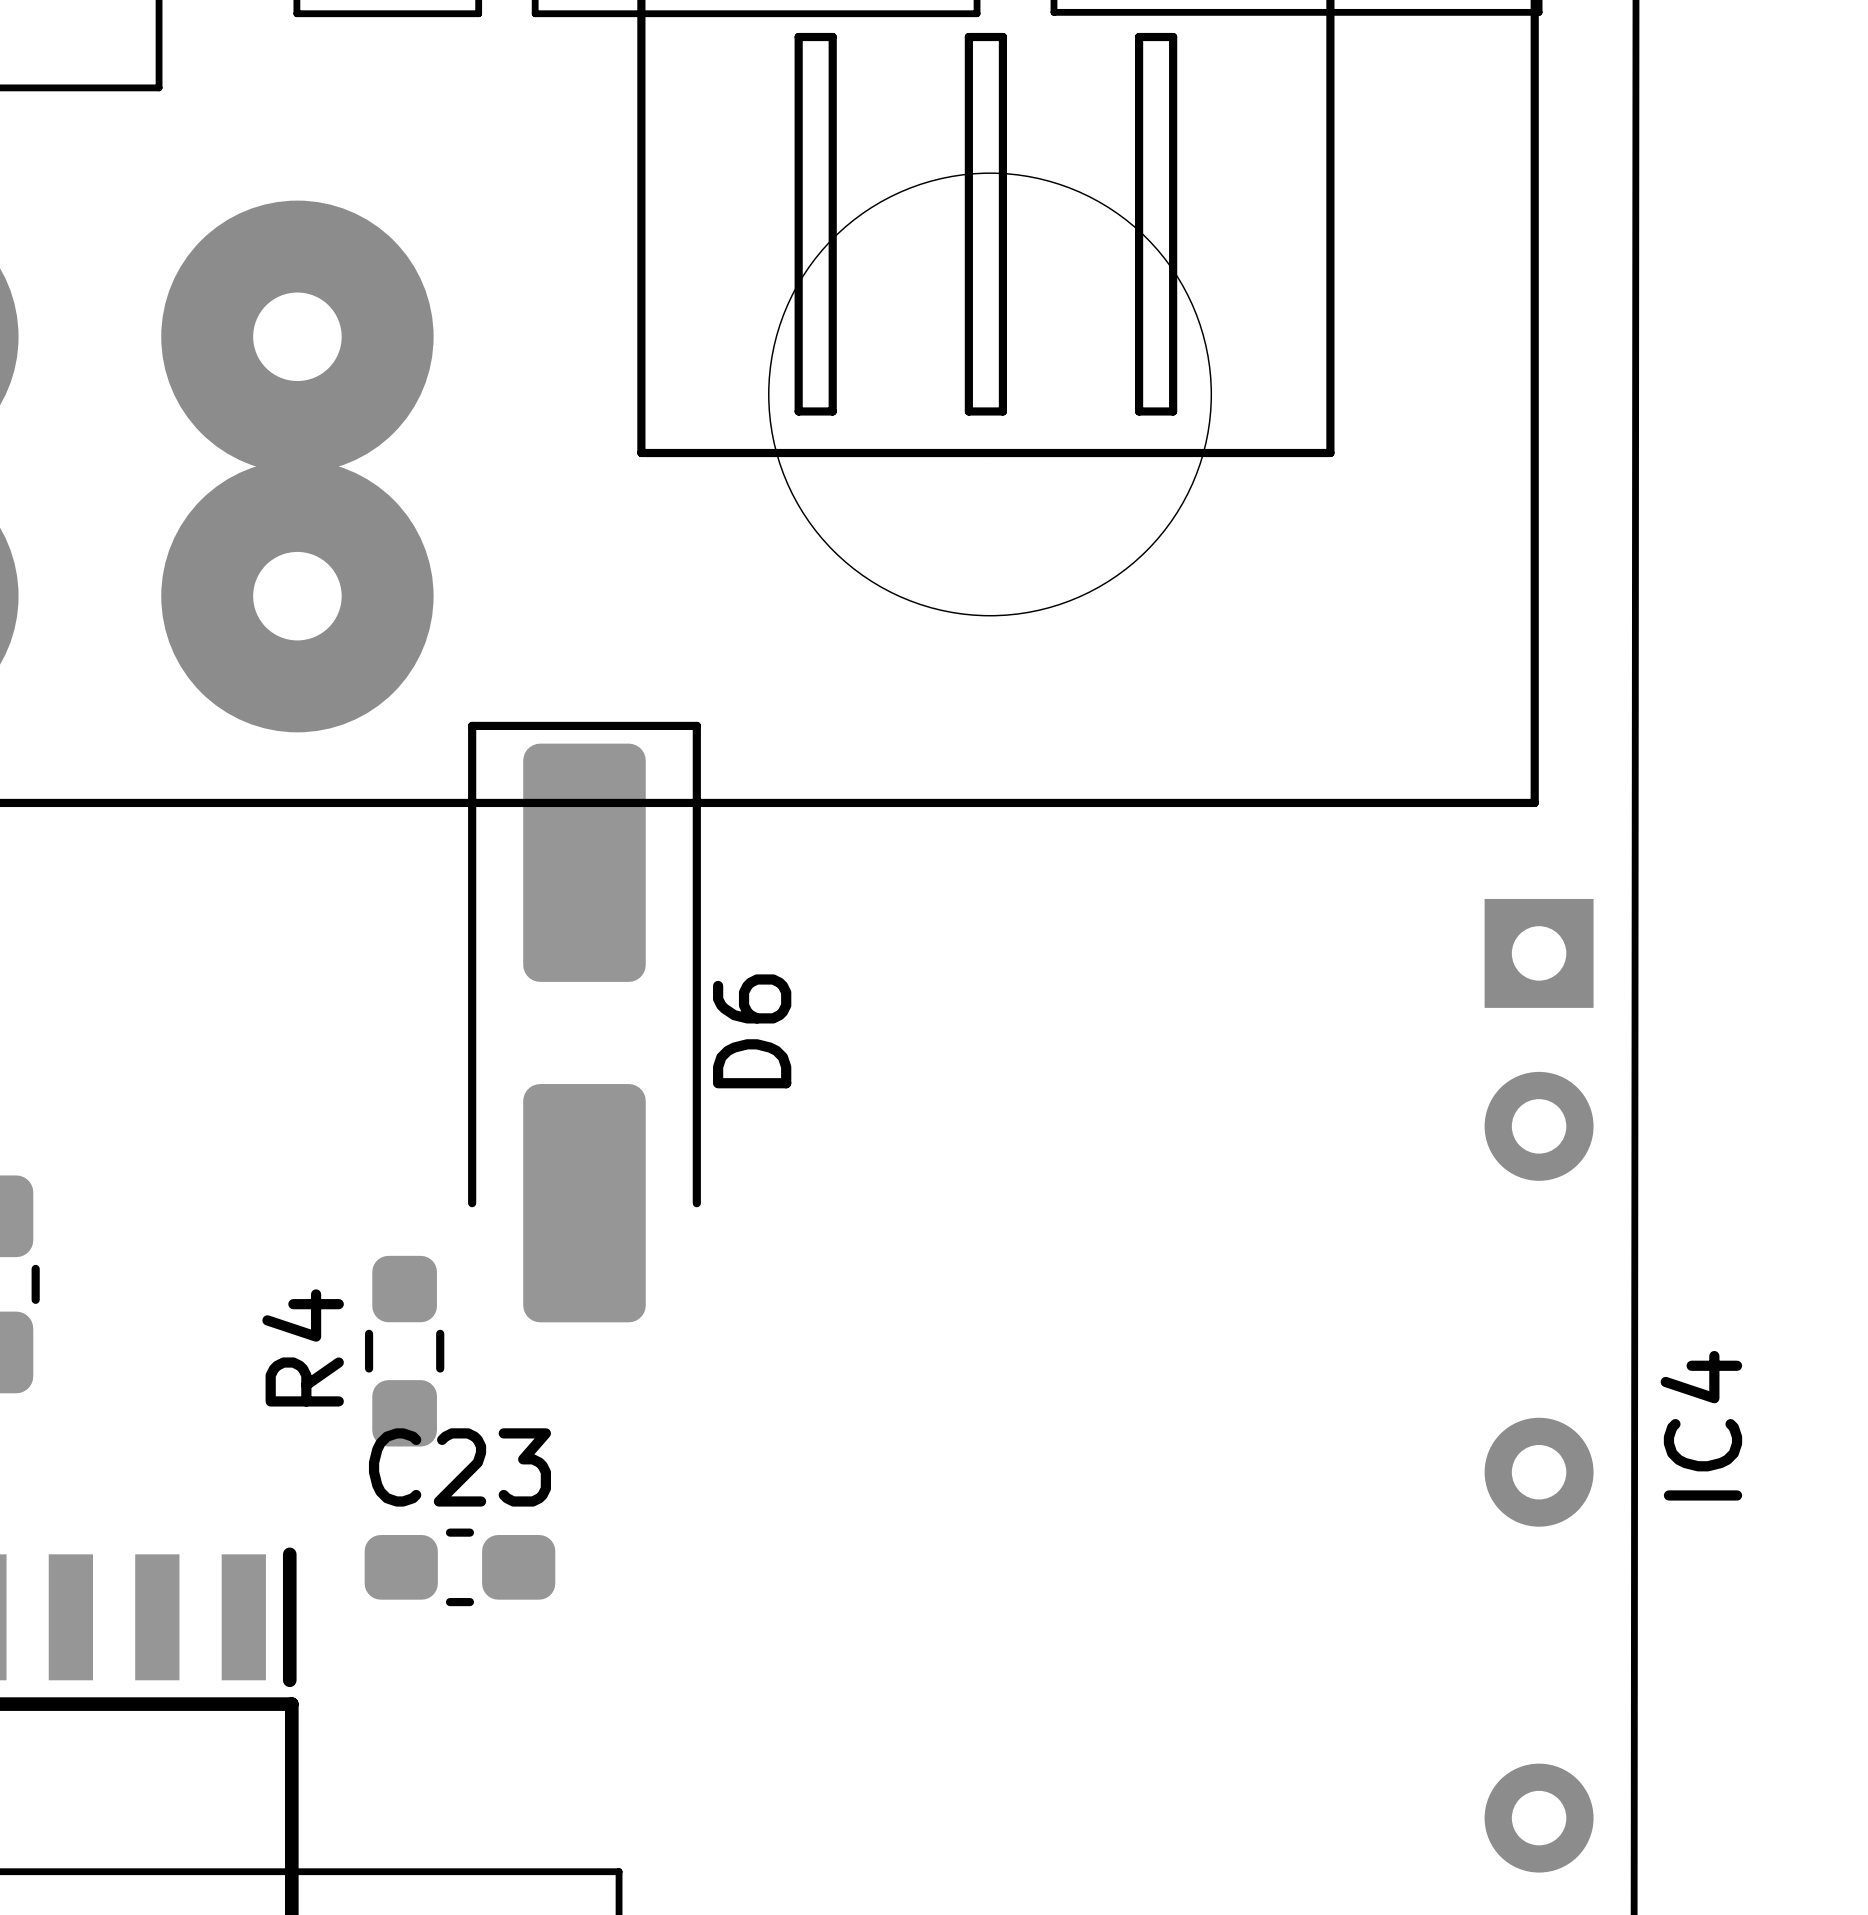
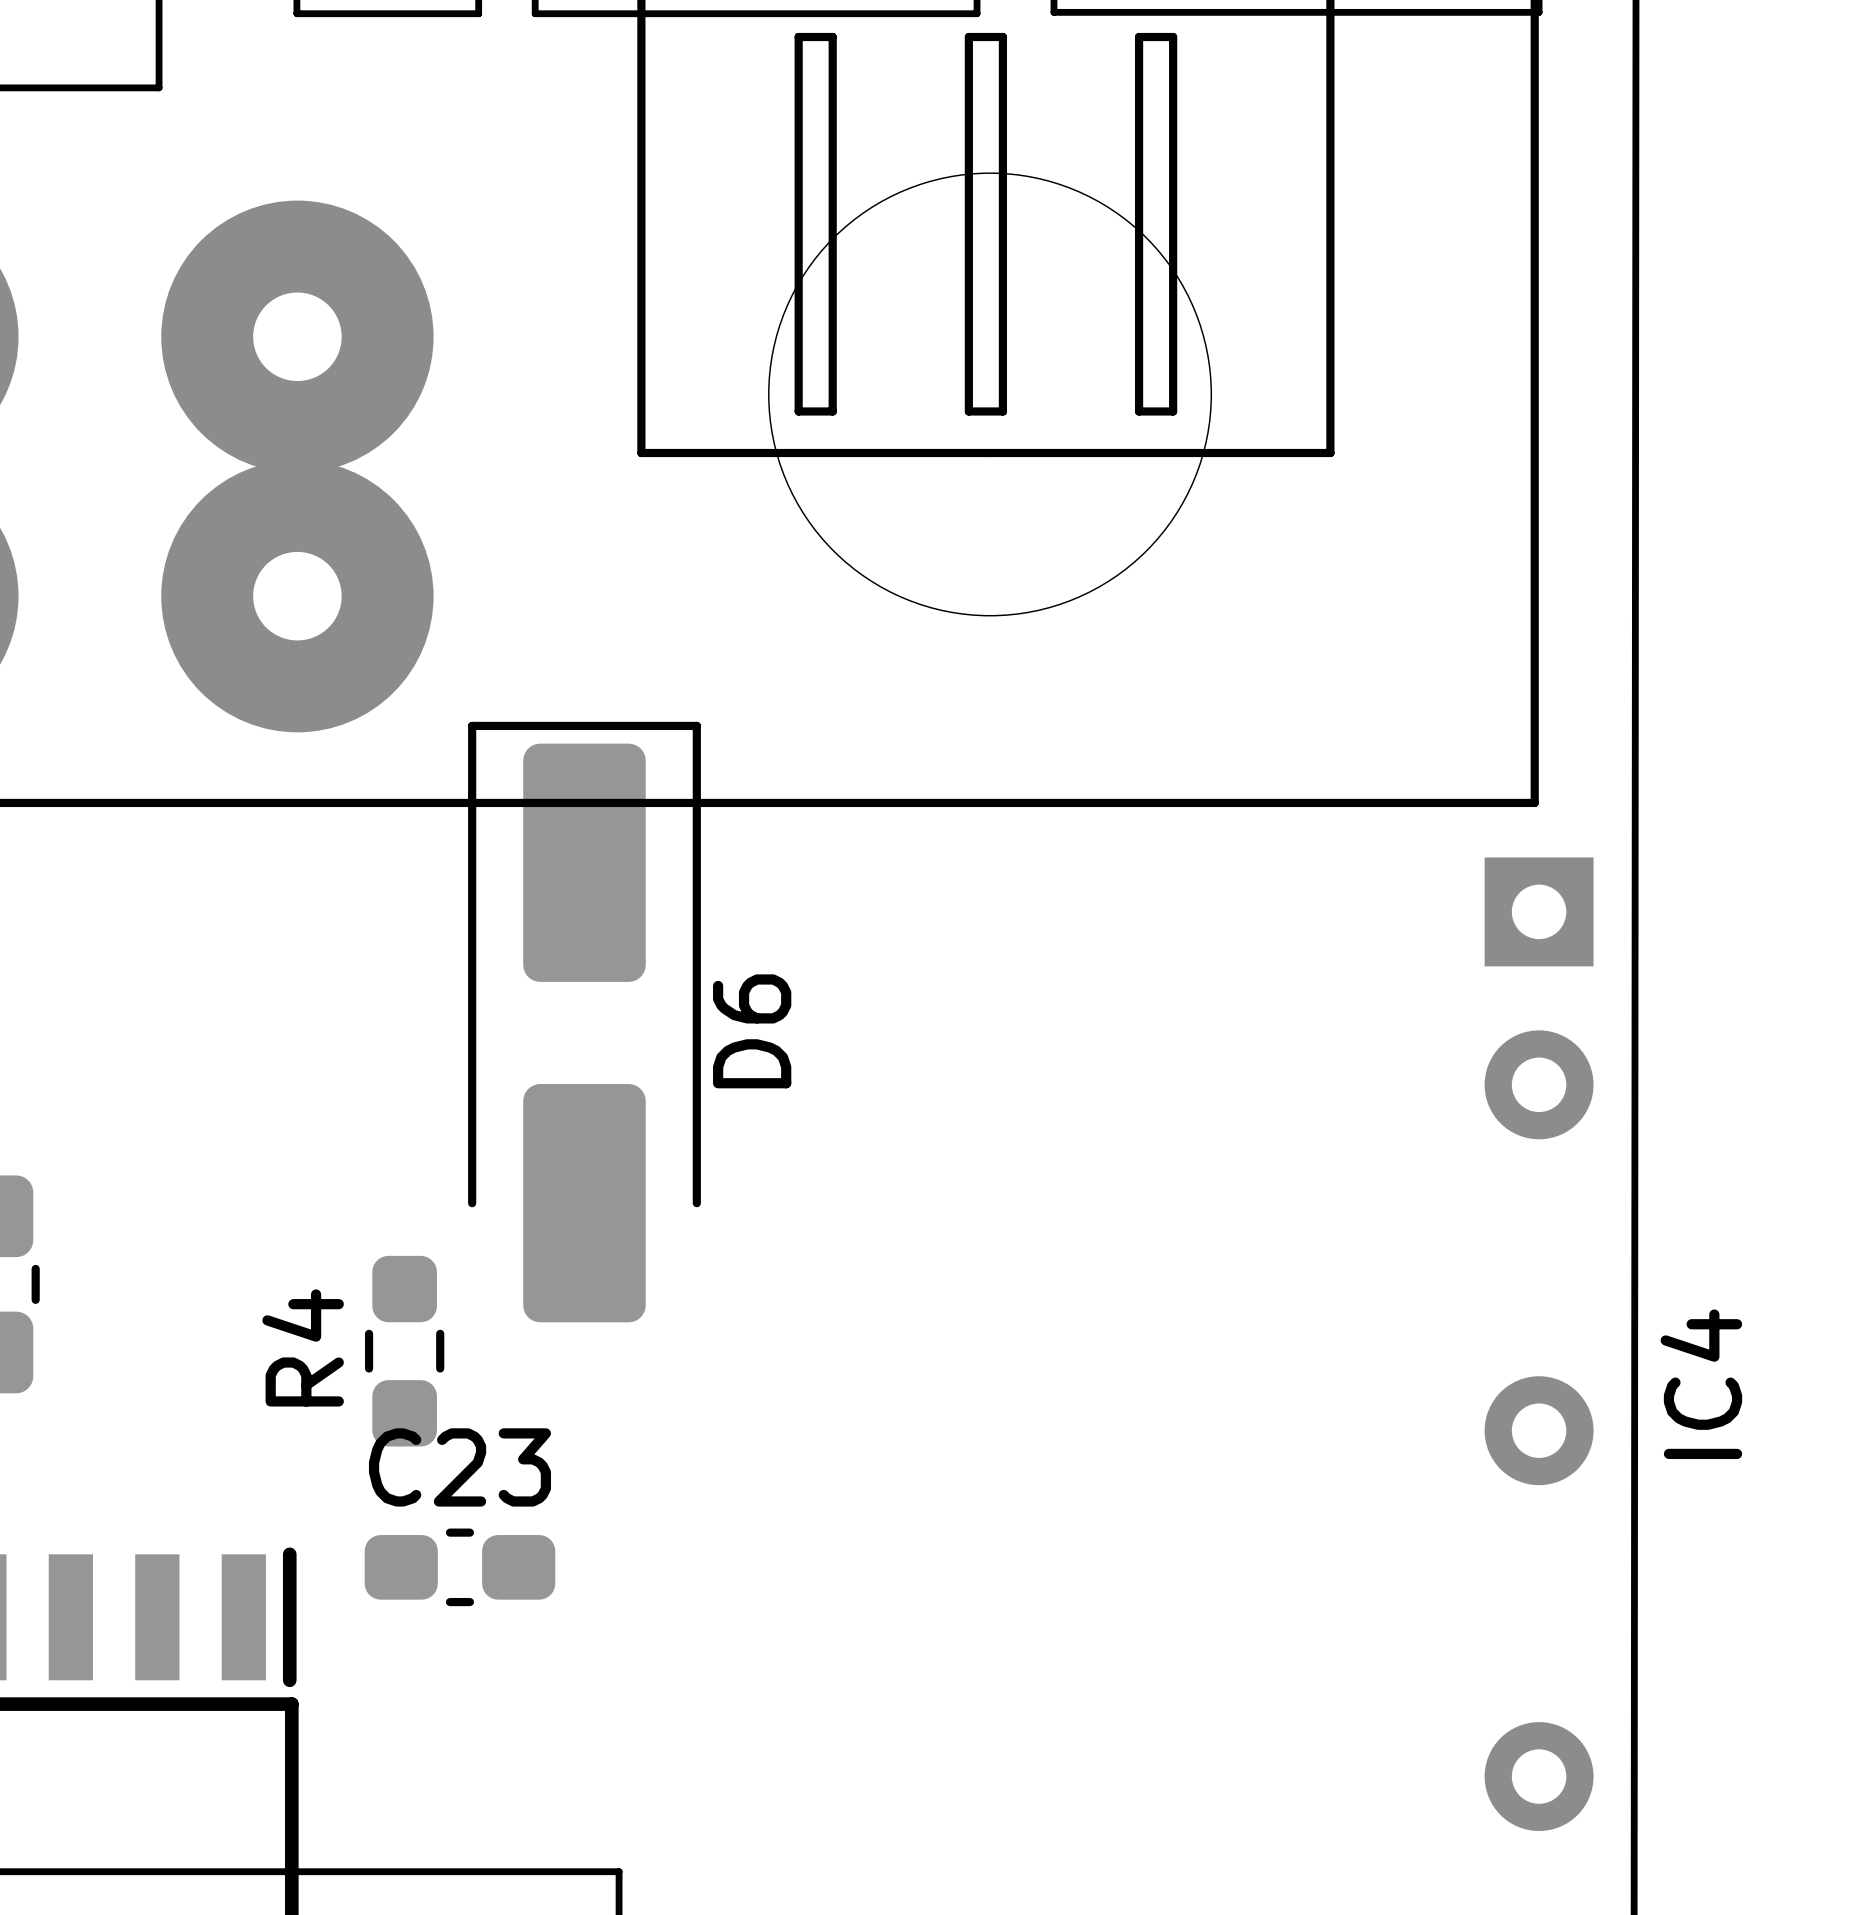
IC4 position: (1539, 1385) -> (1539, 1344)

